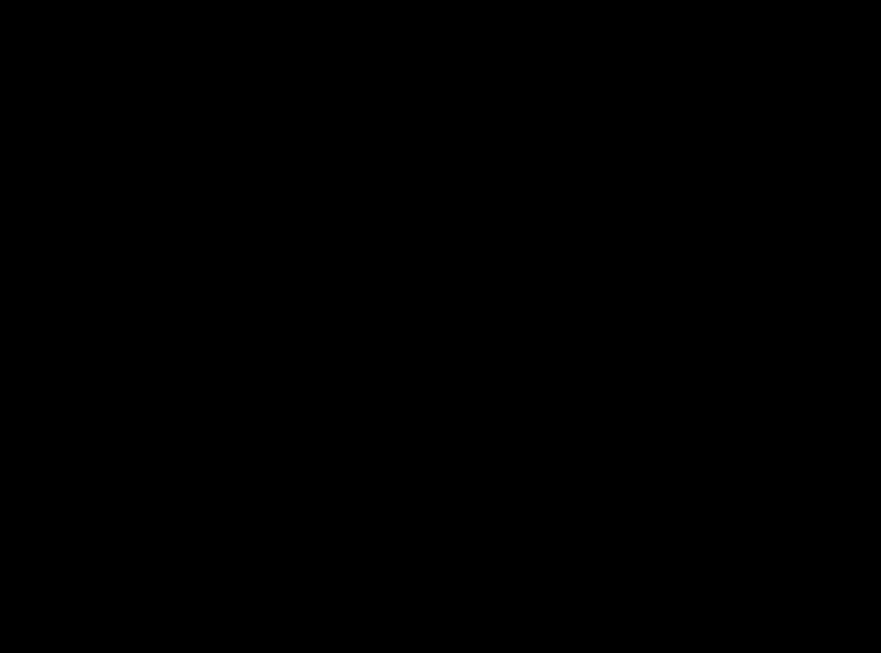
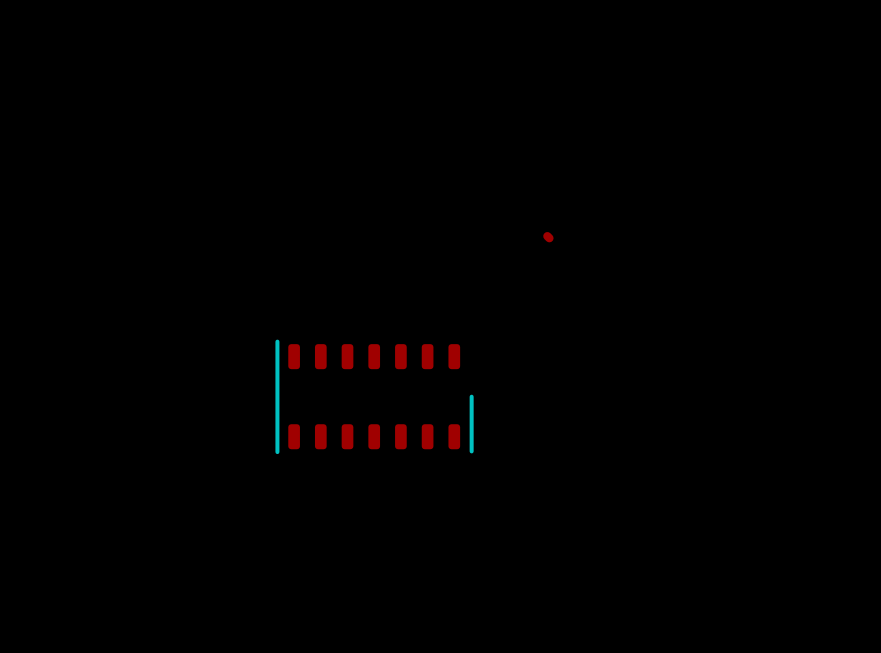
top track: none -> (547, 236) (549, 238)
part: none -> (374, 396)

